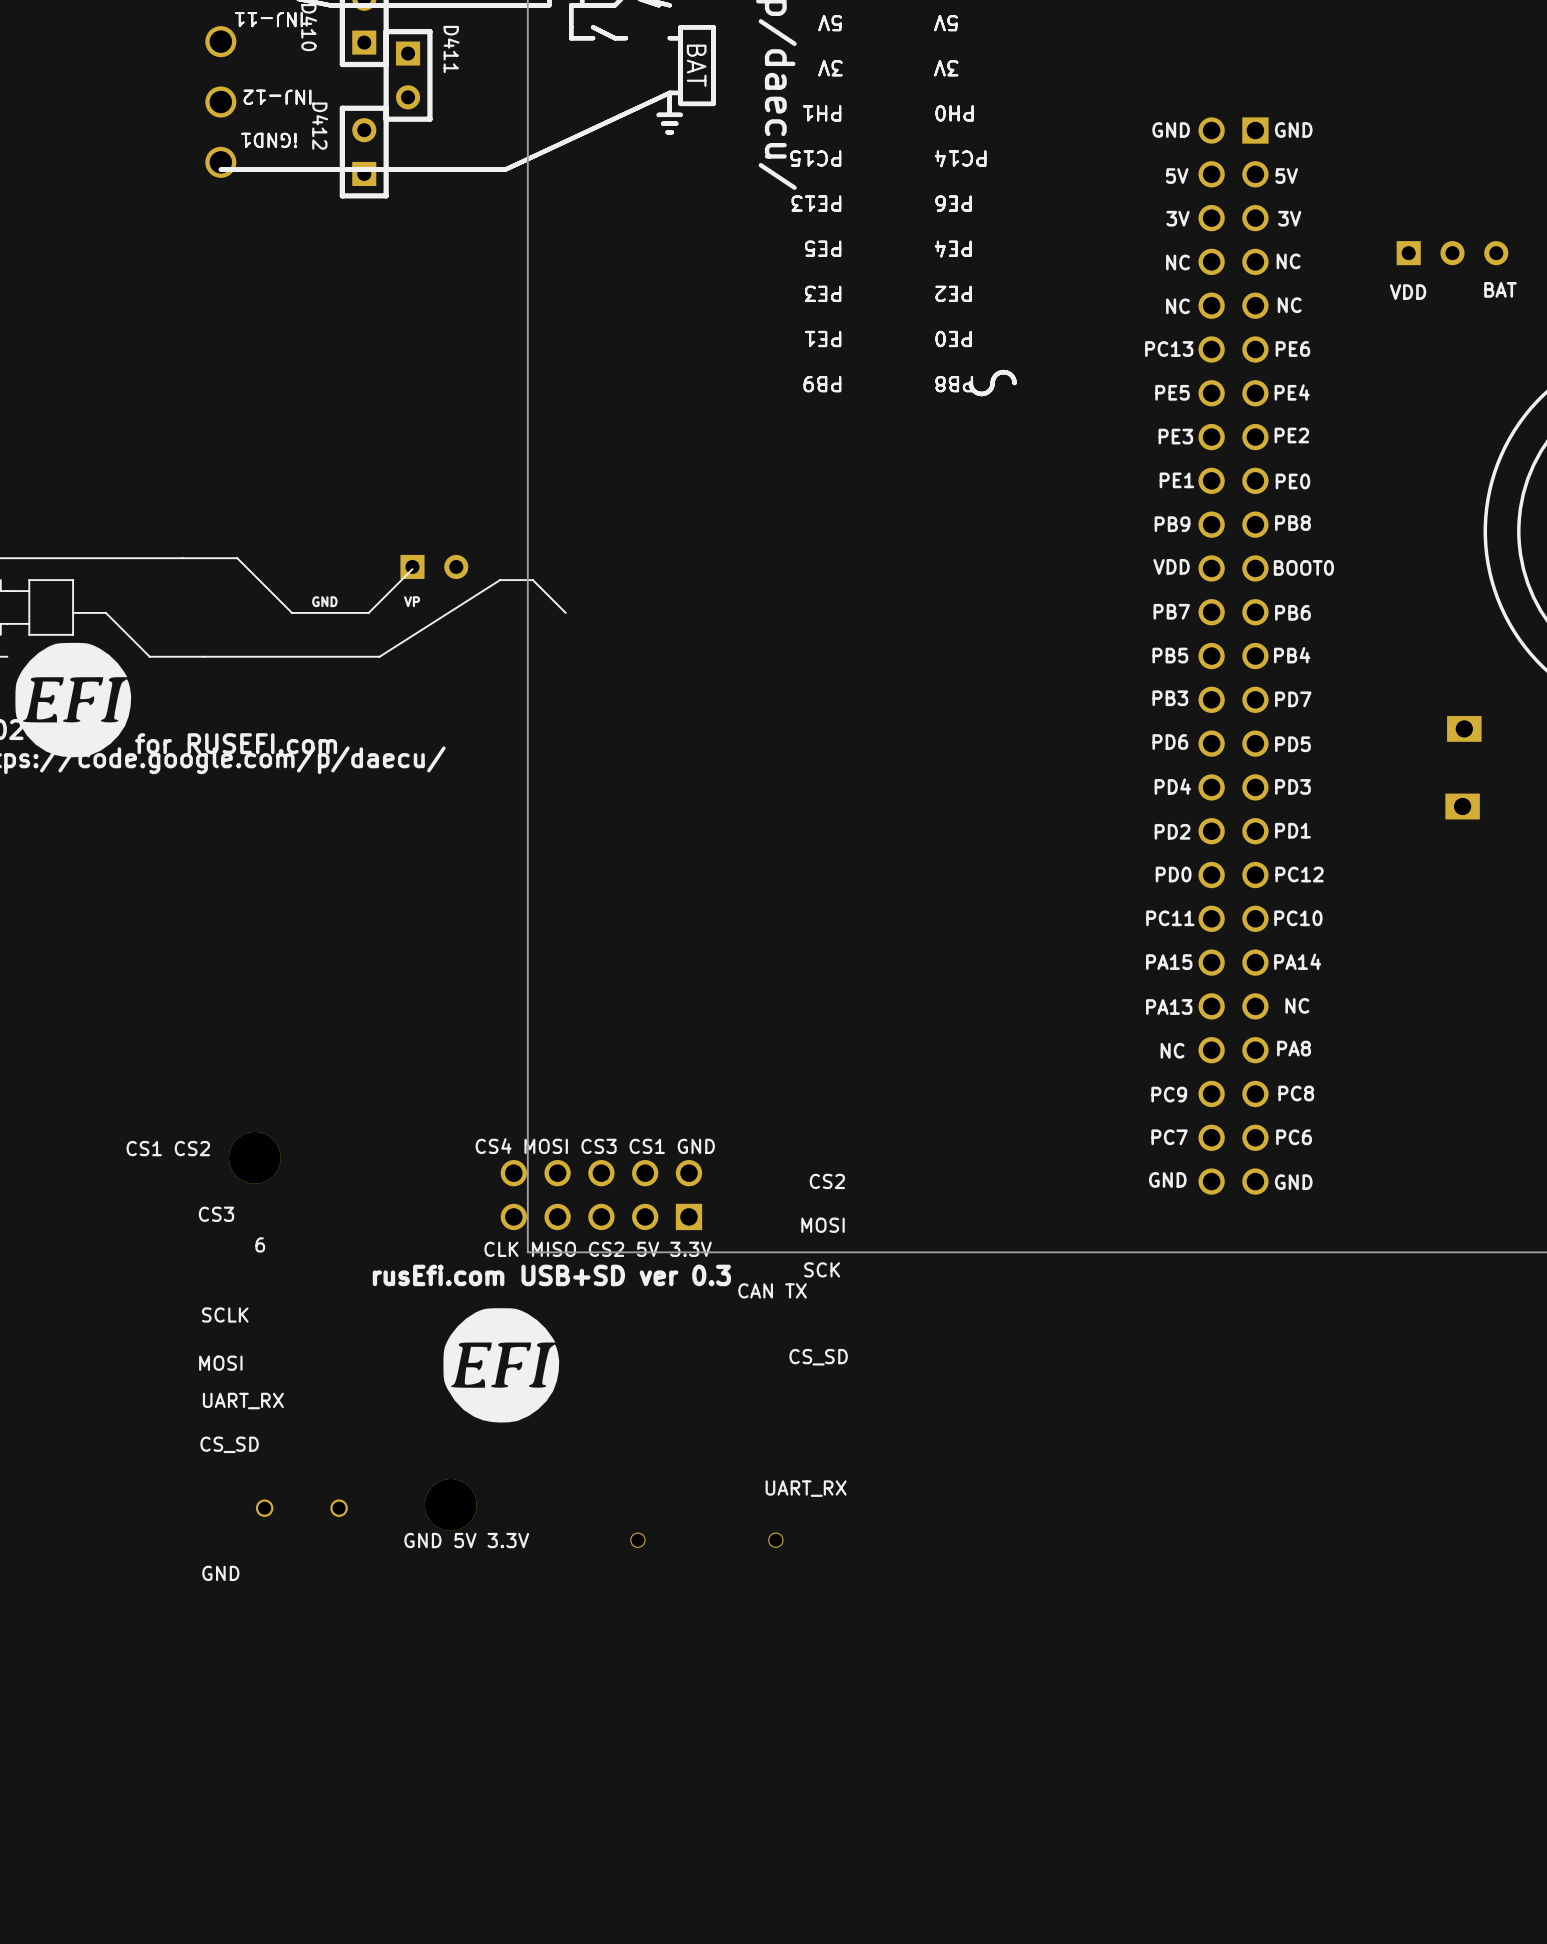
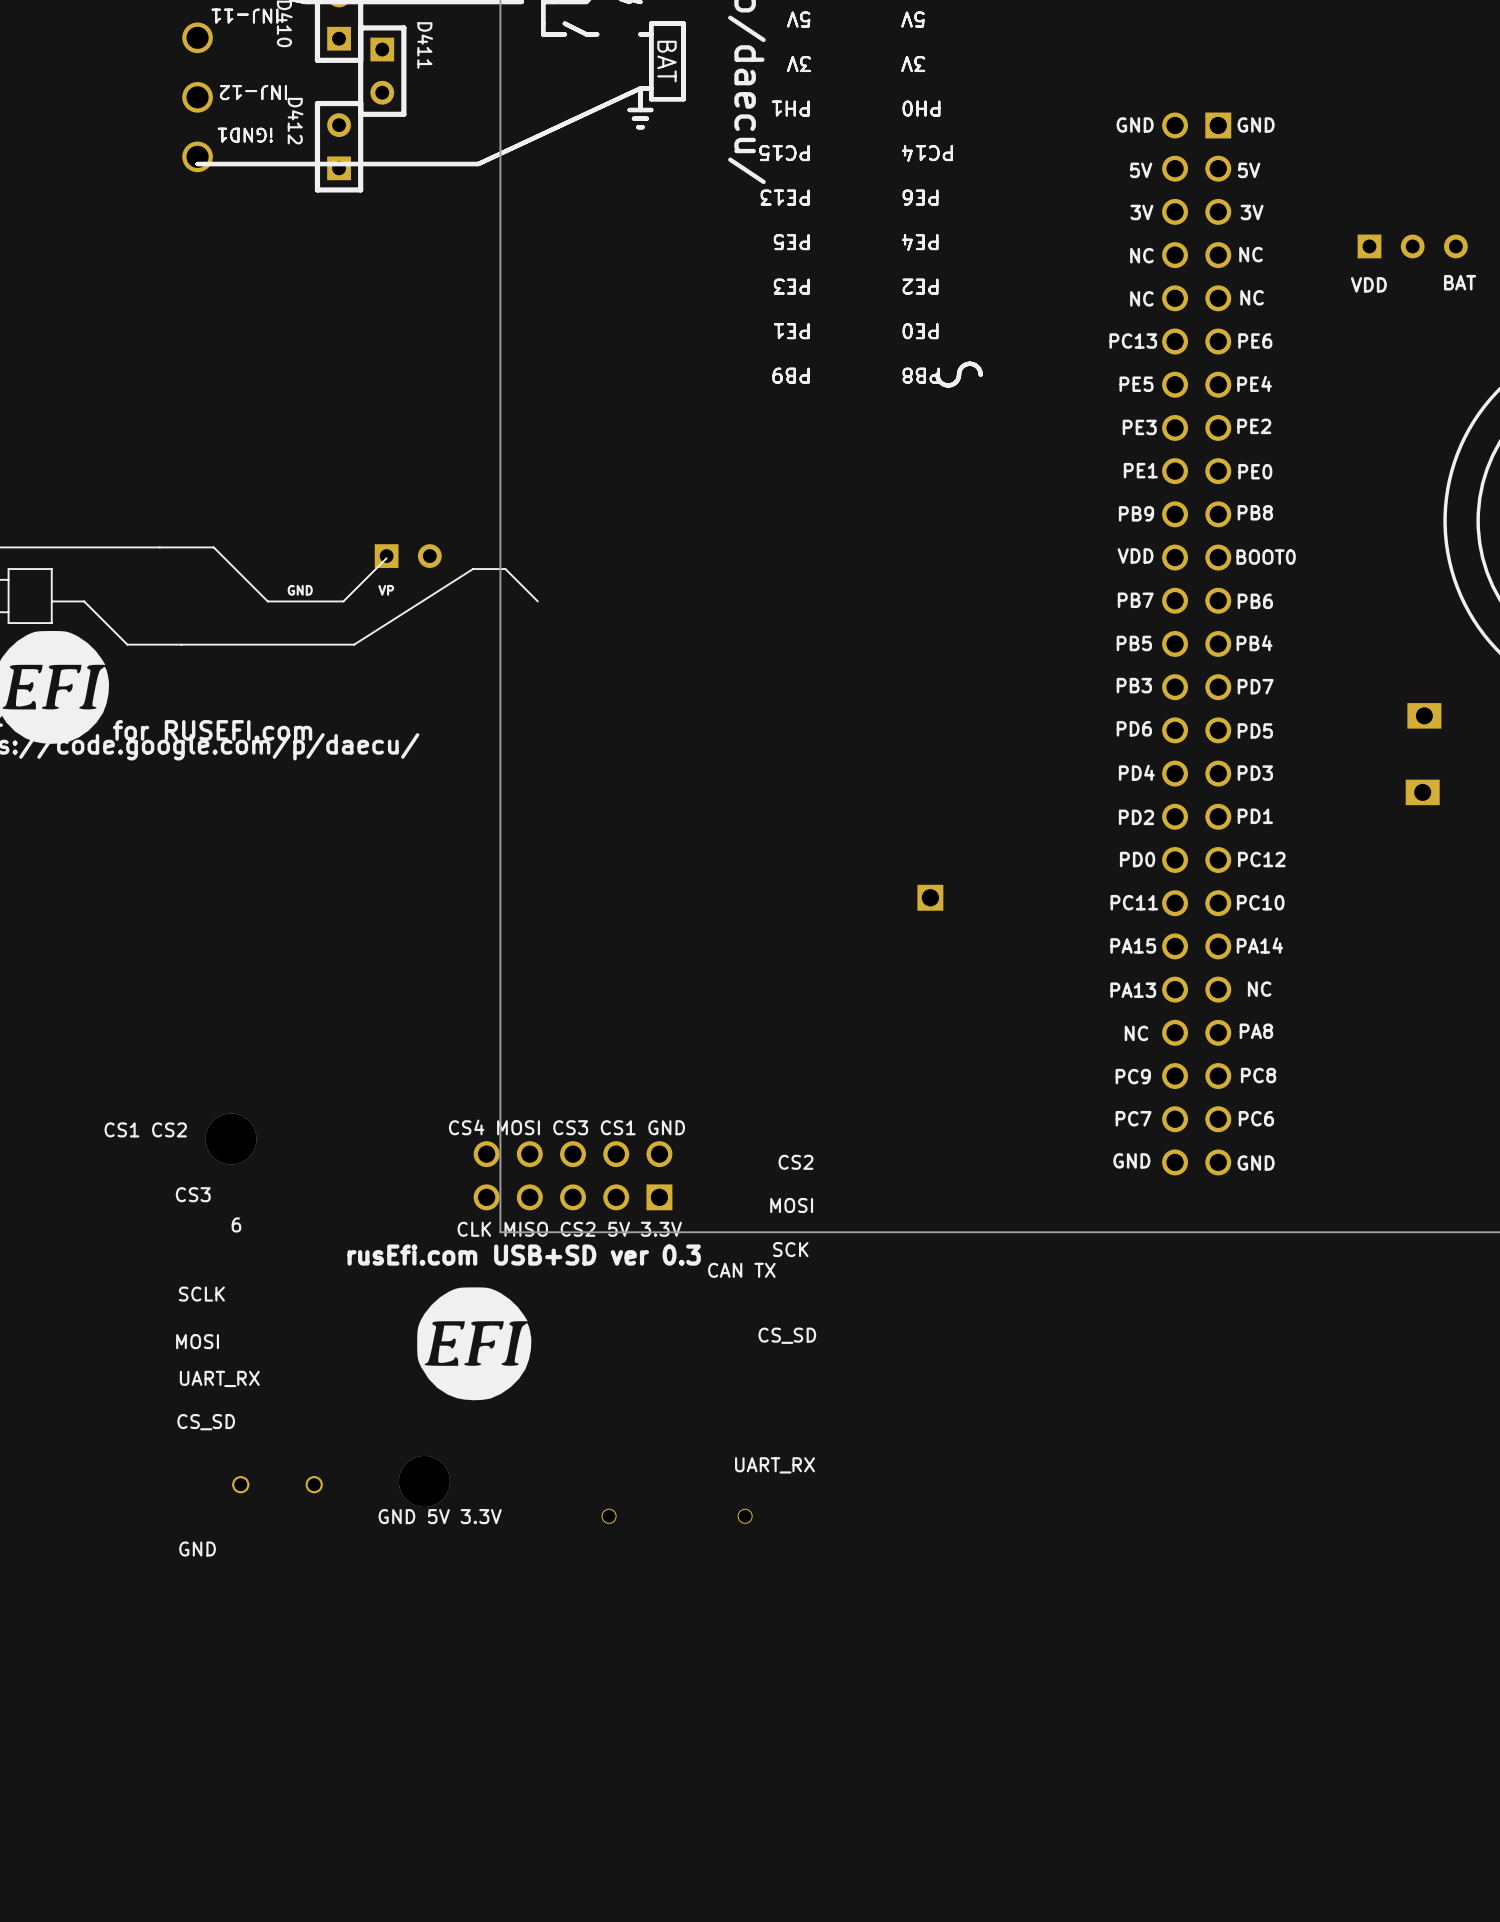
part: none -> (930, 897)

